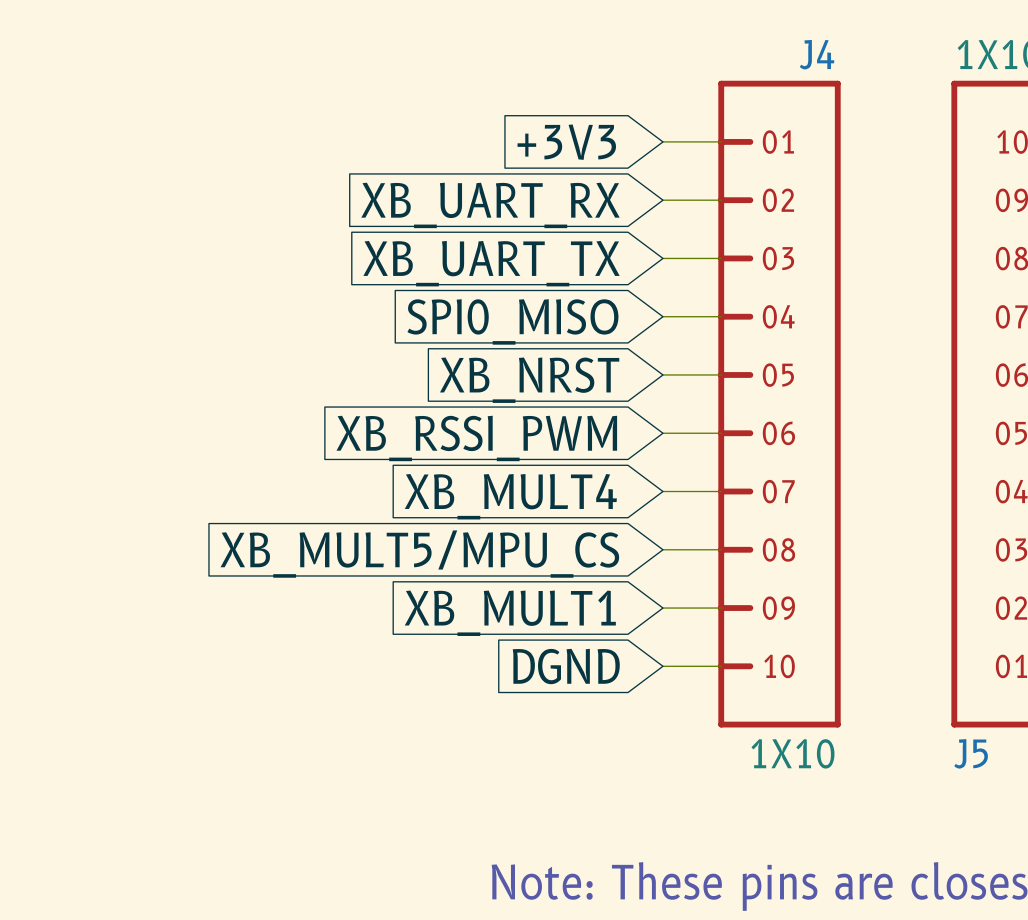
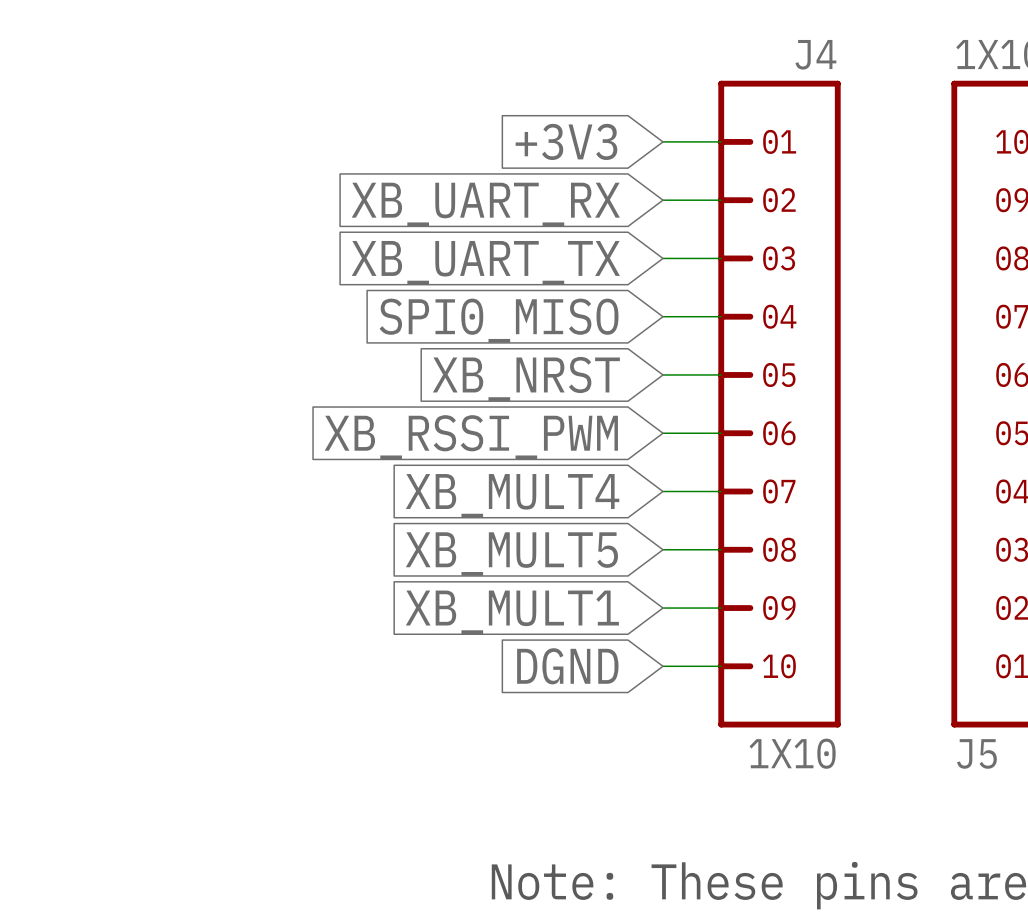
global label: XB_MULT5/MPU_CS (419, 554) -> XB_MULT5 (511, 554)

